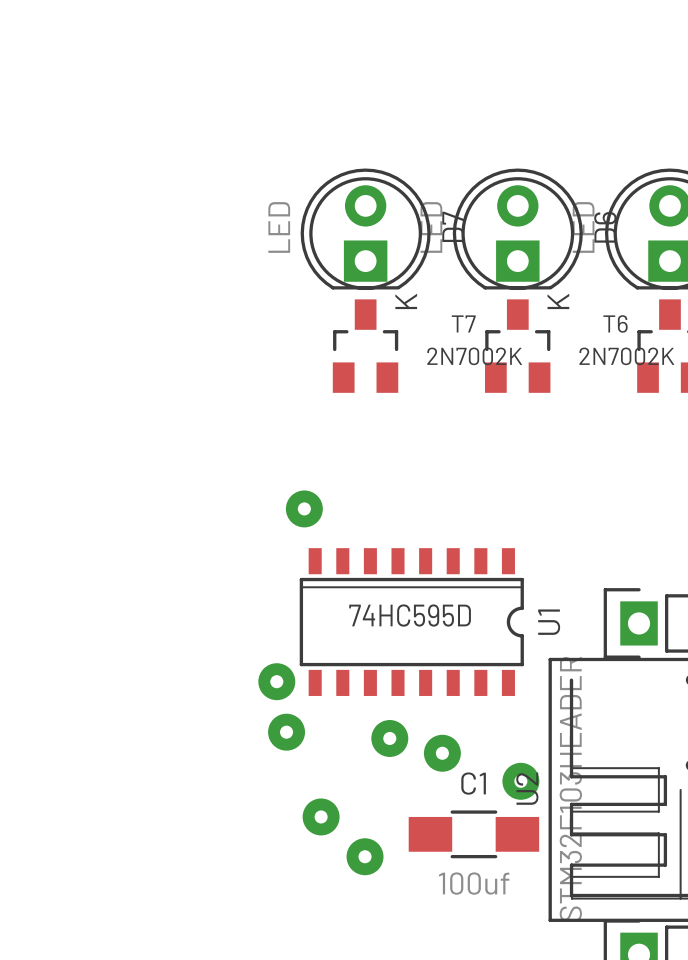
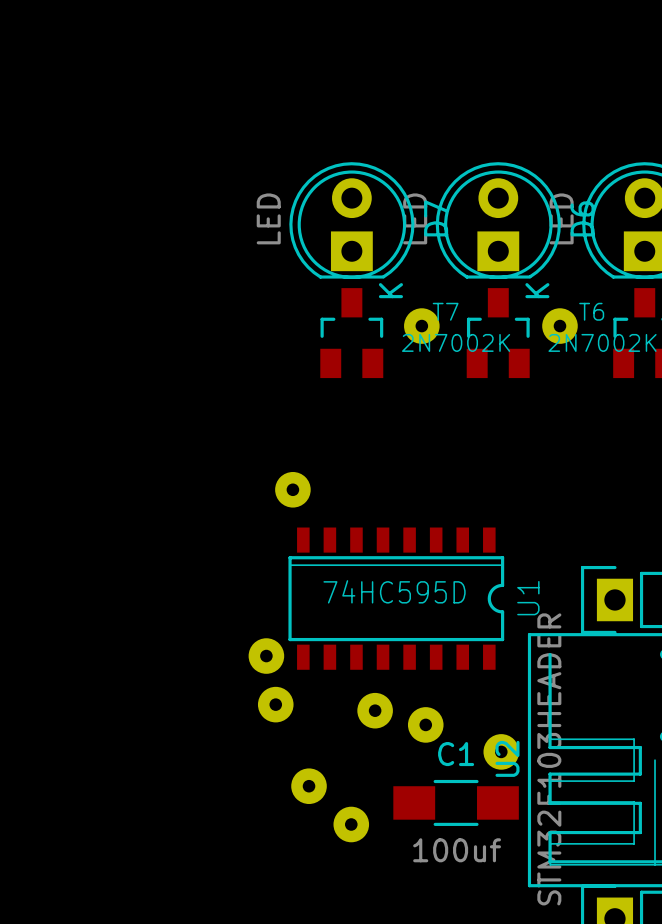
part: none -> (421, 326)
part: none -> (559, 326)

